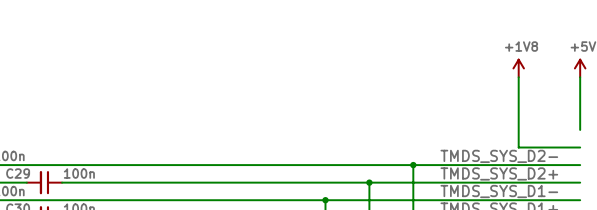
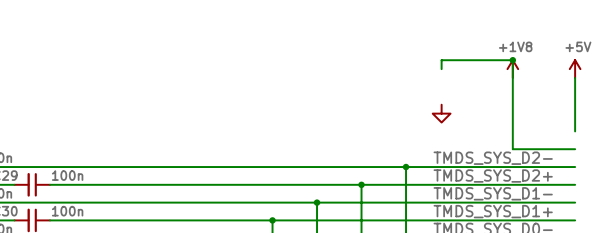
junction: none -> (512, 60)
wire: none -> (441, 69) (441, 60) (512, 60) (512, 78)
power symbol: none -> (441, 113)

